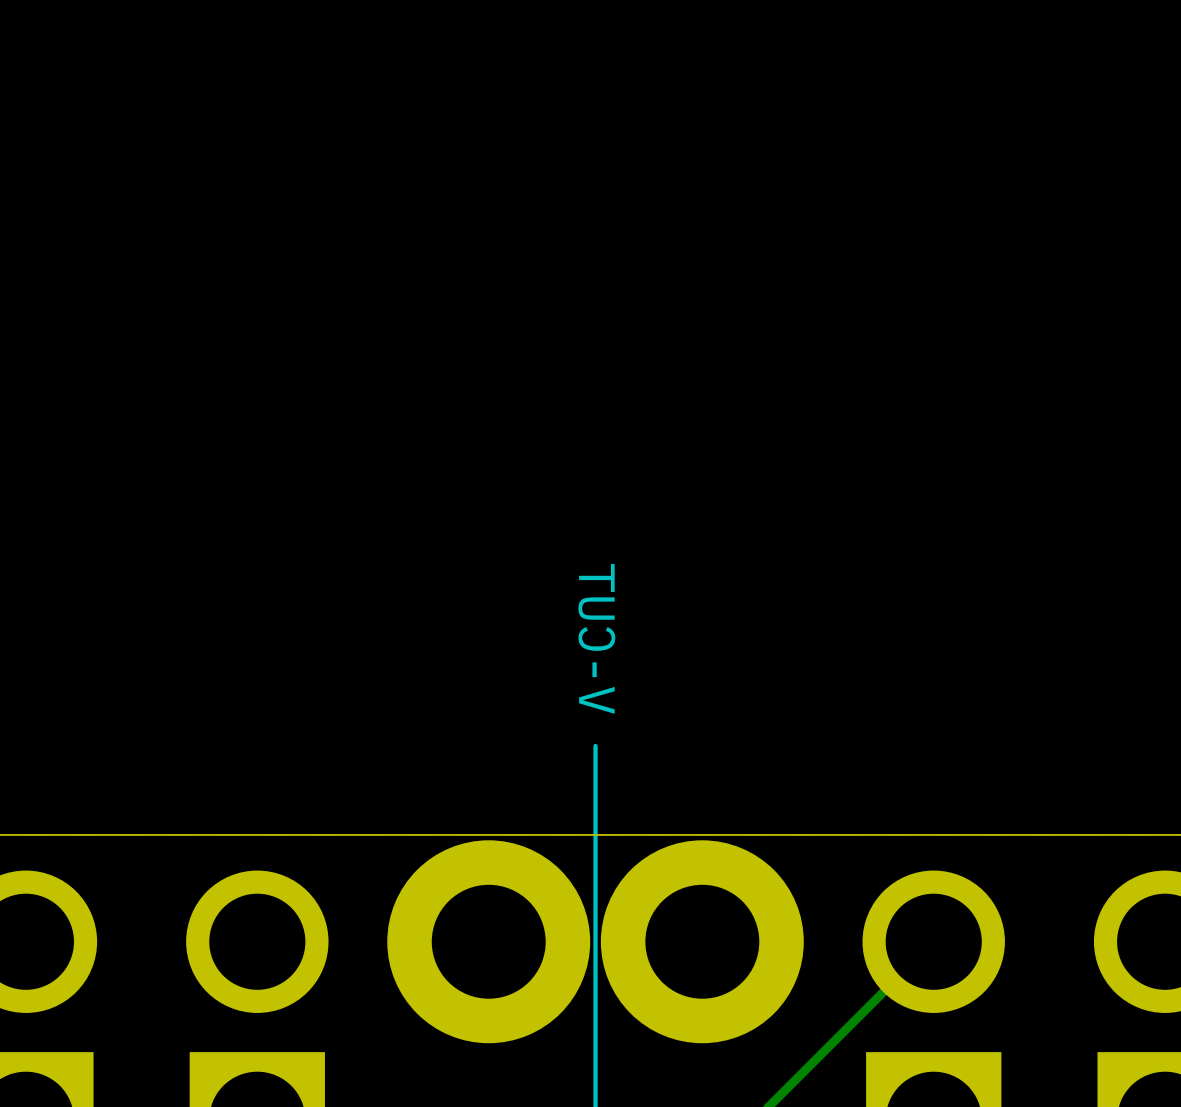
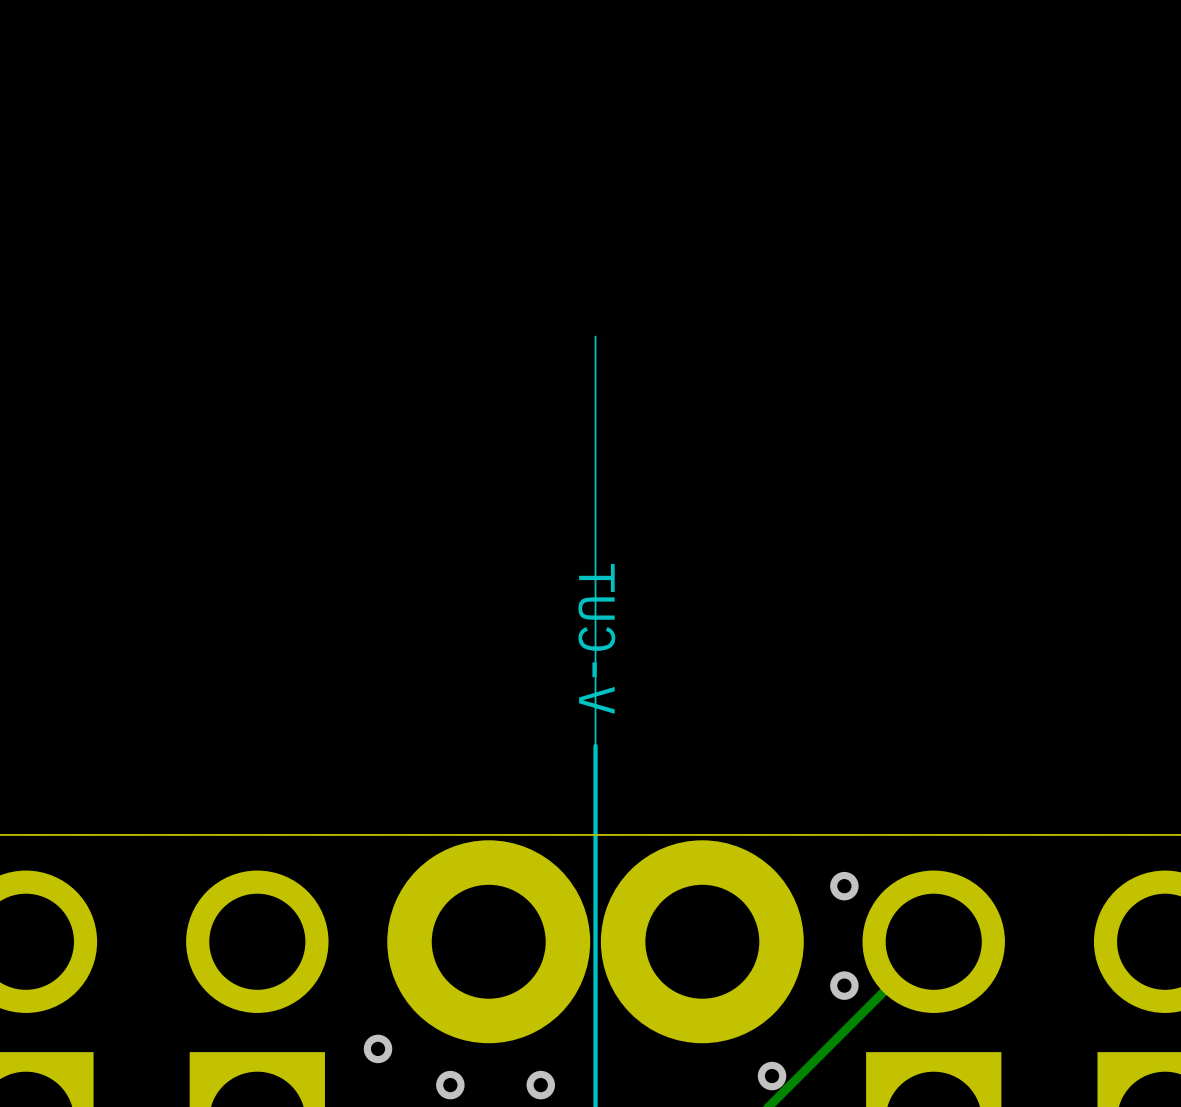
line: none -> (595, 336) (595, 745)
via: none -> (844, 886)
via: none -> (844, 985)
via: none -> (378, 1048)
via: none -> (772, 1076)
via: none -> (450, 1085)
via: none -> (540, 1085)

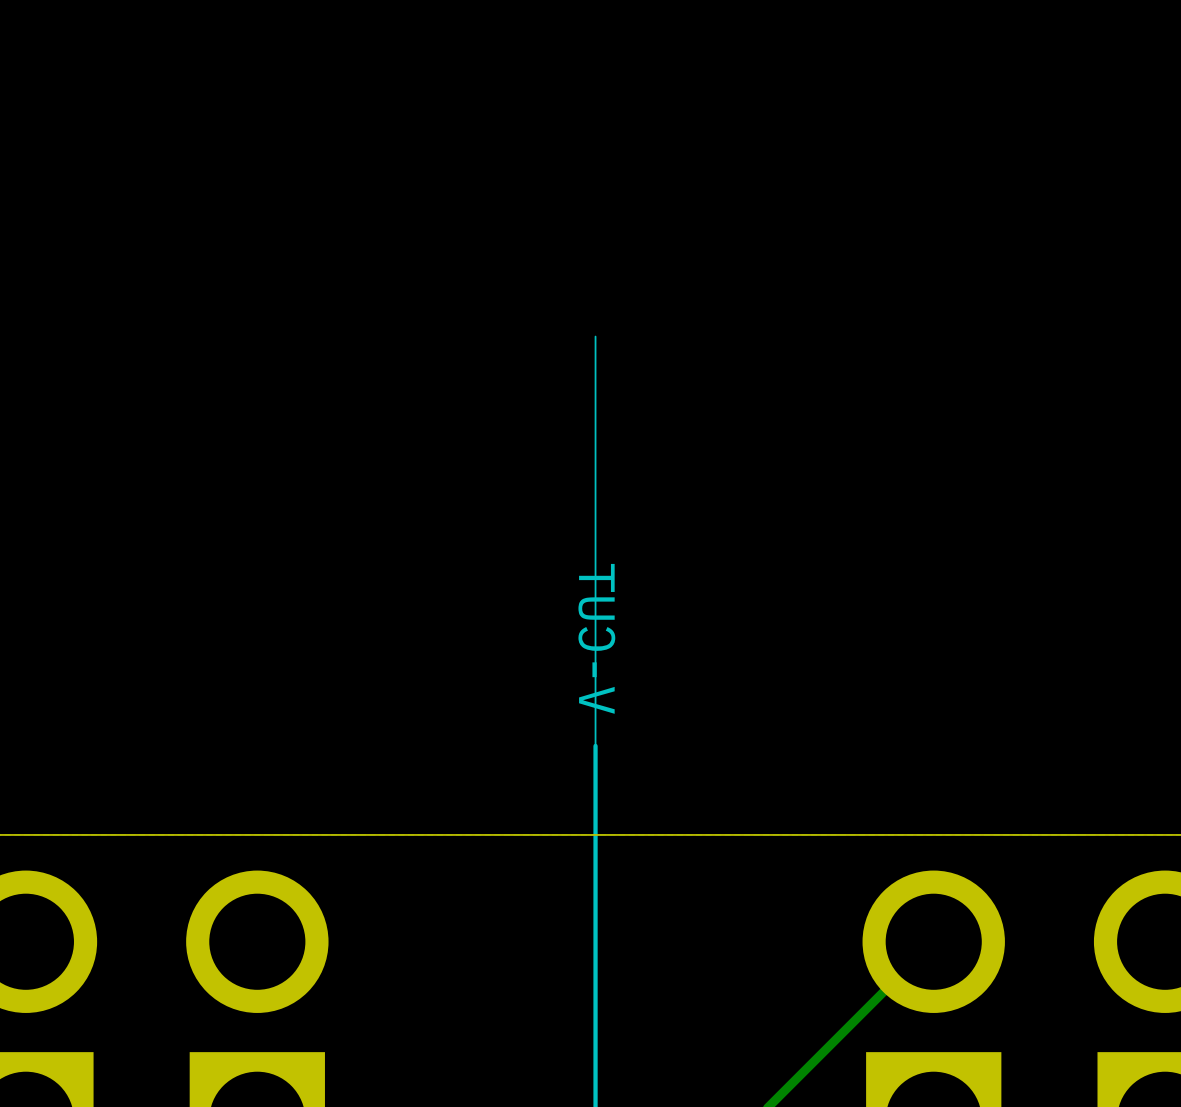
via: (844, 886) -> none
part: (488, 941) -> none
part: (702, 941) -> none
via: (844, 985) -> none
via: (378, 1048) -> none
via: (772, 1076) -> none
via: (450, 1085) -> none
via: (540, 1085) -> none

